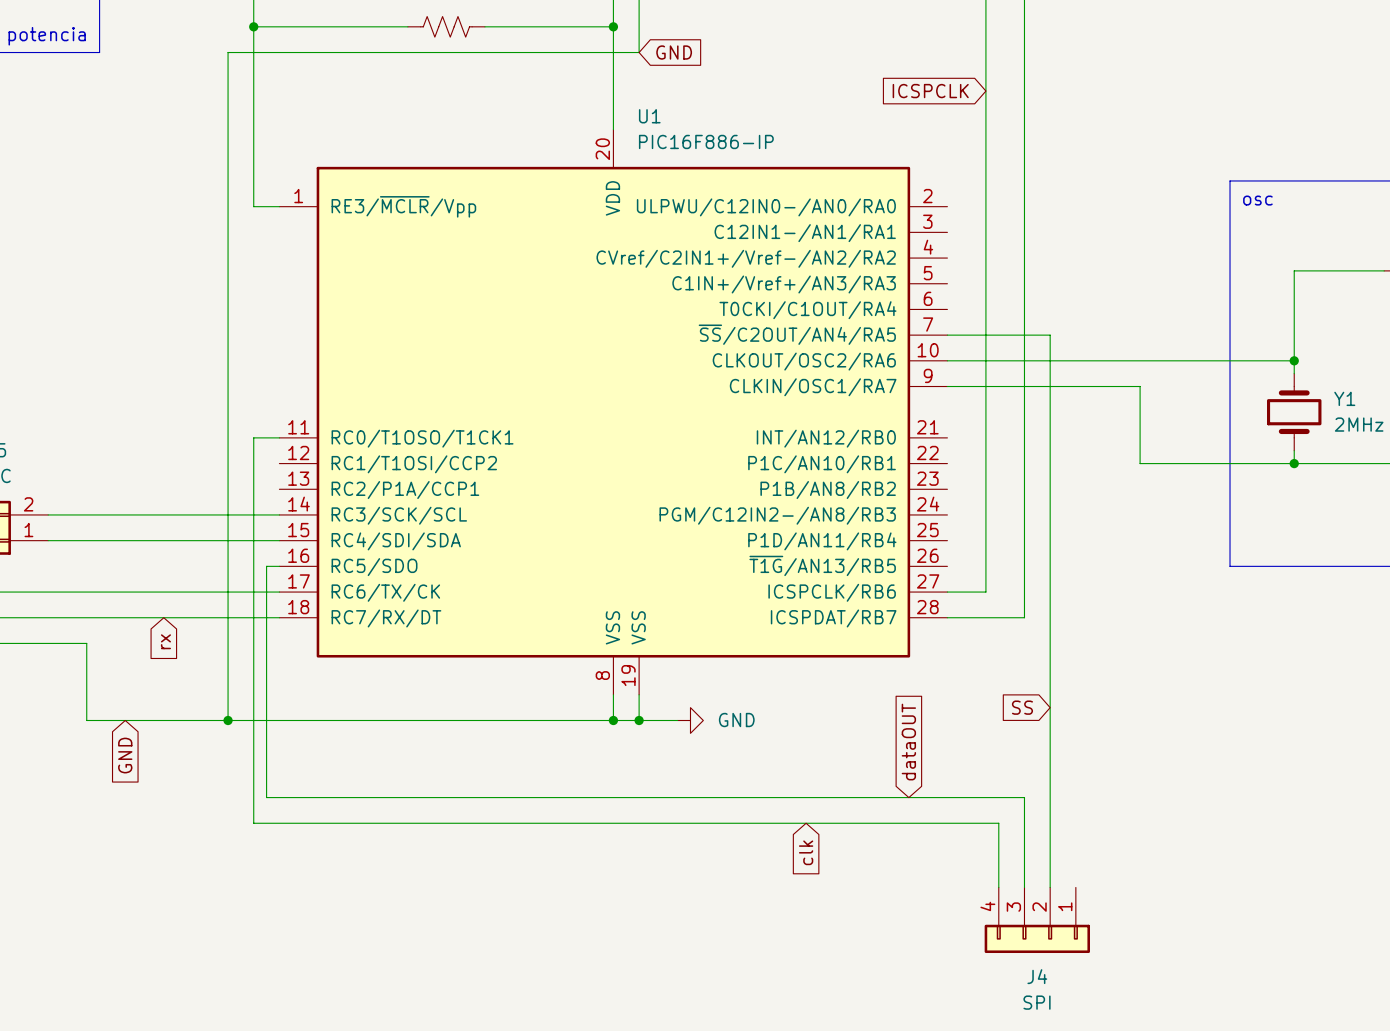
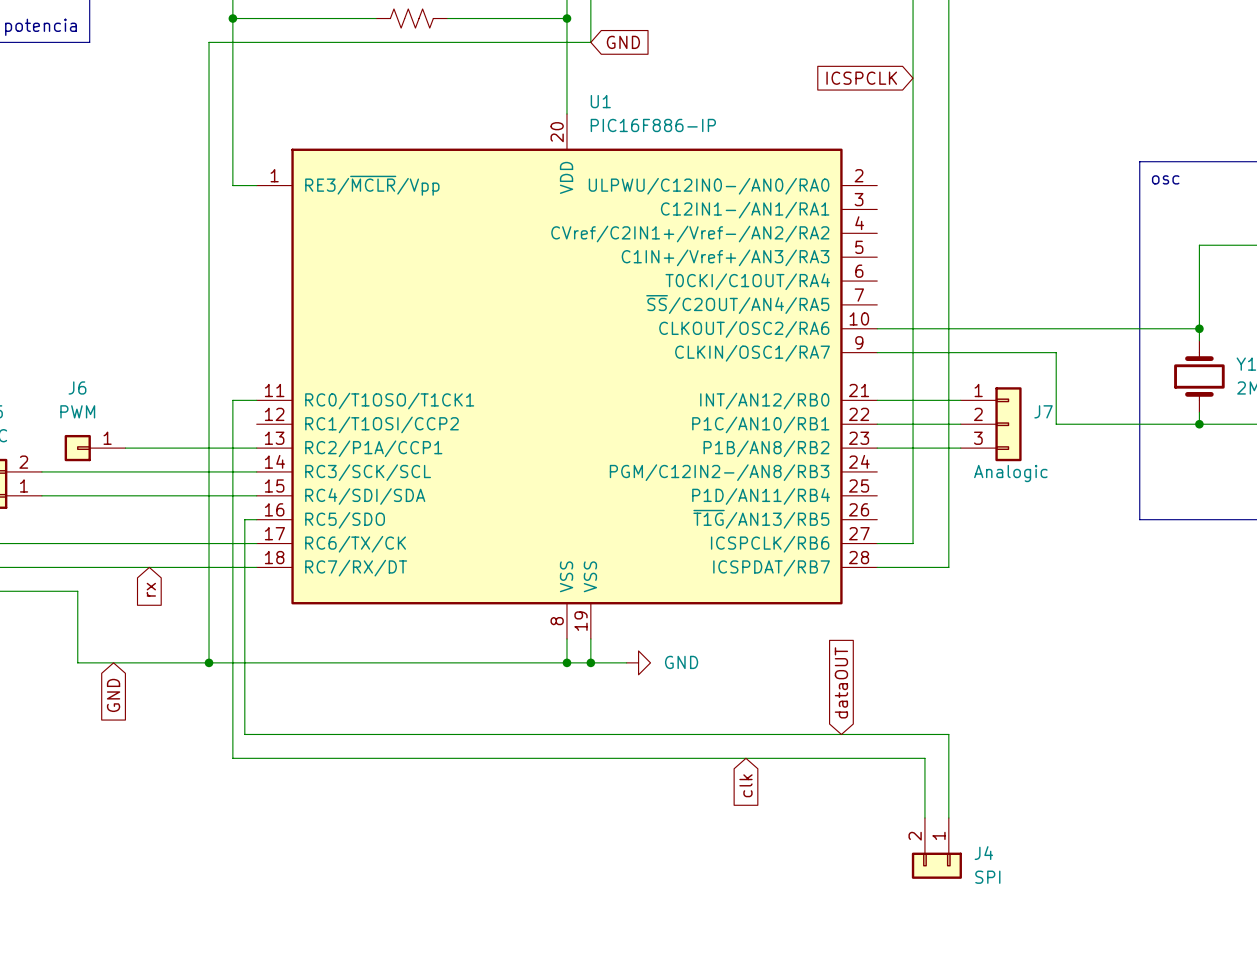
wire: (947, 335) (1050, 335) (1050, 887) -> none
wire: none -> (877, 400) (960, 400)
wire: none -> (877, 424) (960, 424)
J7: none -> Analogic (991, 424)
J6: none -> PWM (95, 448)
wire: none -> (125, 448) (256, 448)
wire: none -> (877, 448) (960, 448)
global label: SS (1022, 707) -> none
J4 symbol: [984, 887, 1090, 954] -> [911, 818, 962, 879]
J4 name position: J4 (1037, 976) -> J4 (983, 853)
J4 value position: SPI (1037, 1002) -> SPI (987, 877)

